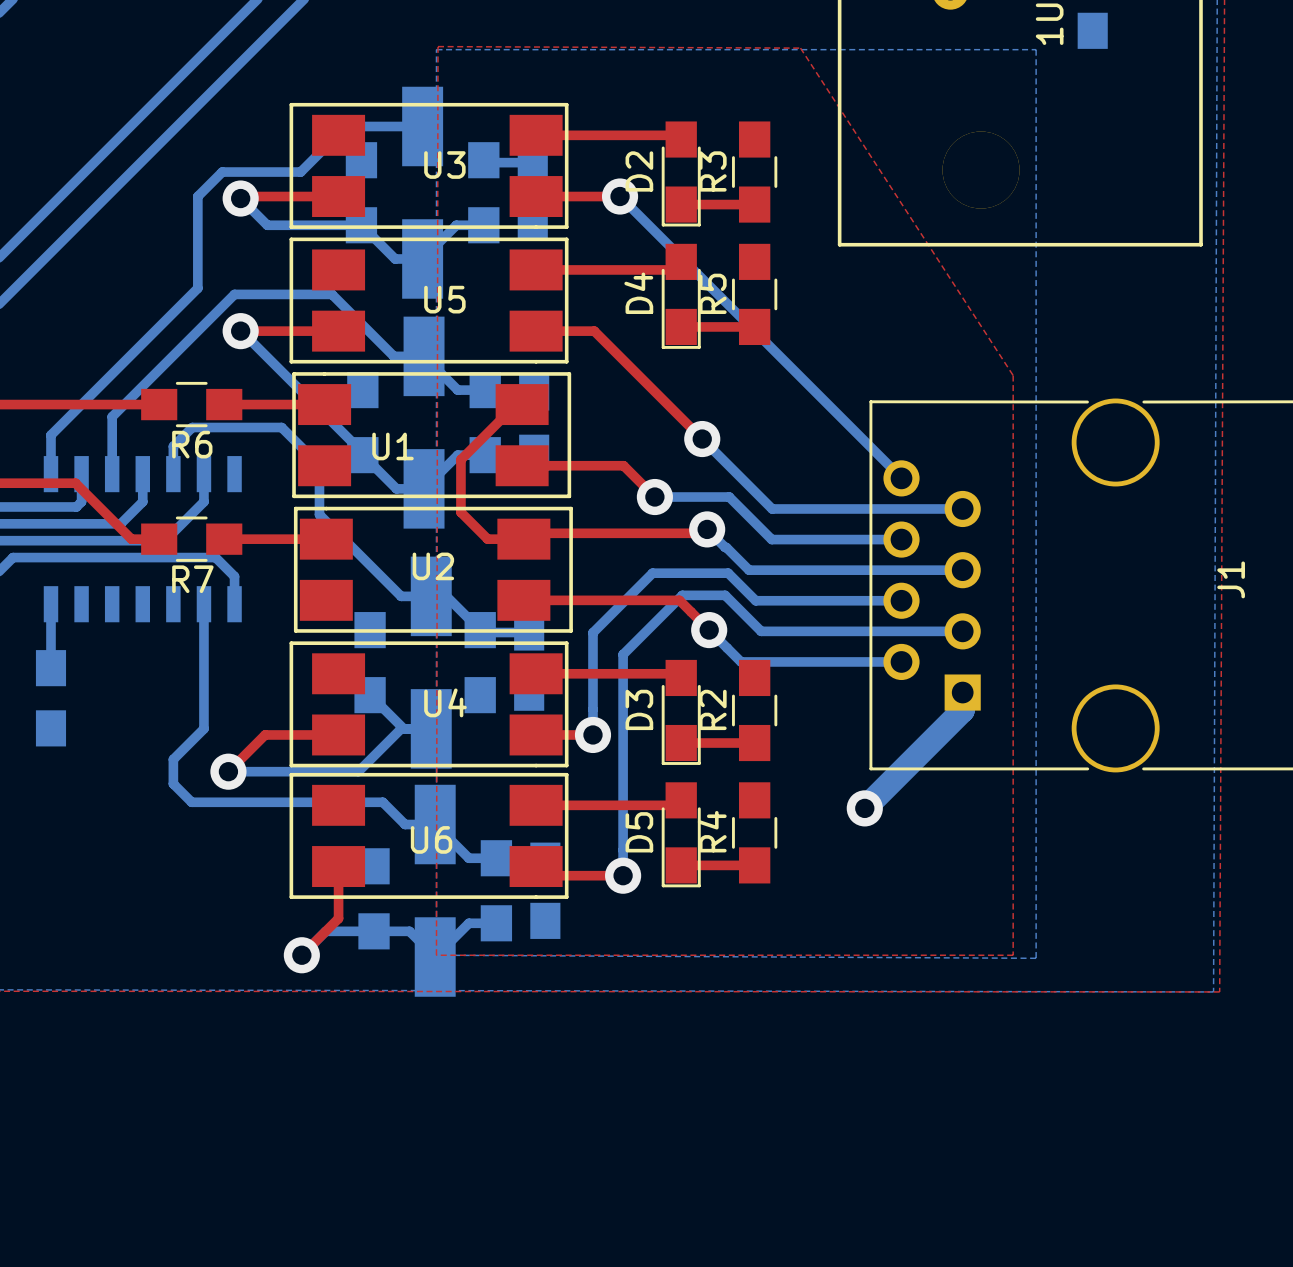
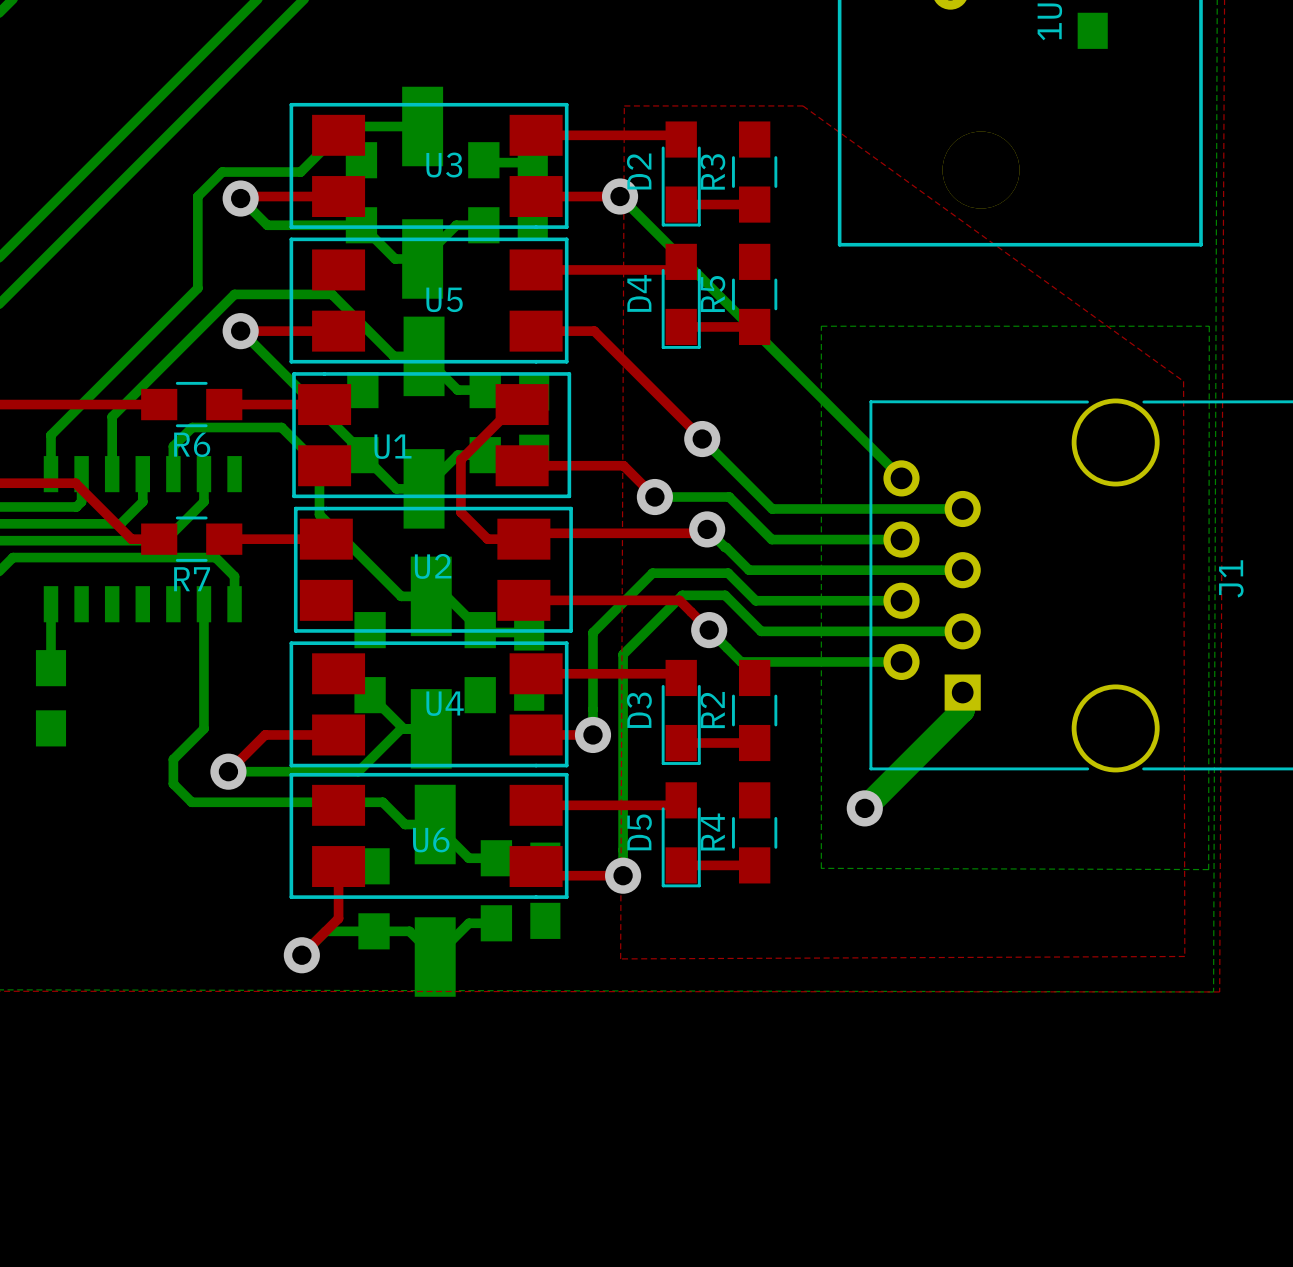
top zone outline: (438, 46) (436, 955) (1013, 955) (1013, 375) (800, 48) (438, 46) -> none
bottom zone outline: (436, 49) (436, 955) (1036, 958) (1036, 49) (436, 49) -> none
top zone outline: none -> (624, 105) (620, 958) (1184, 956) (1183, 381) (802, 105) (624, 105)
bottom zone outline: none -> (821, 326) (821, 868) (1208, 869) (1209, 326) (821, 326)

